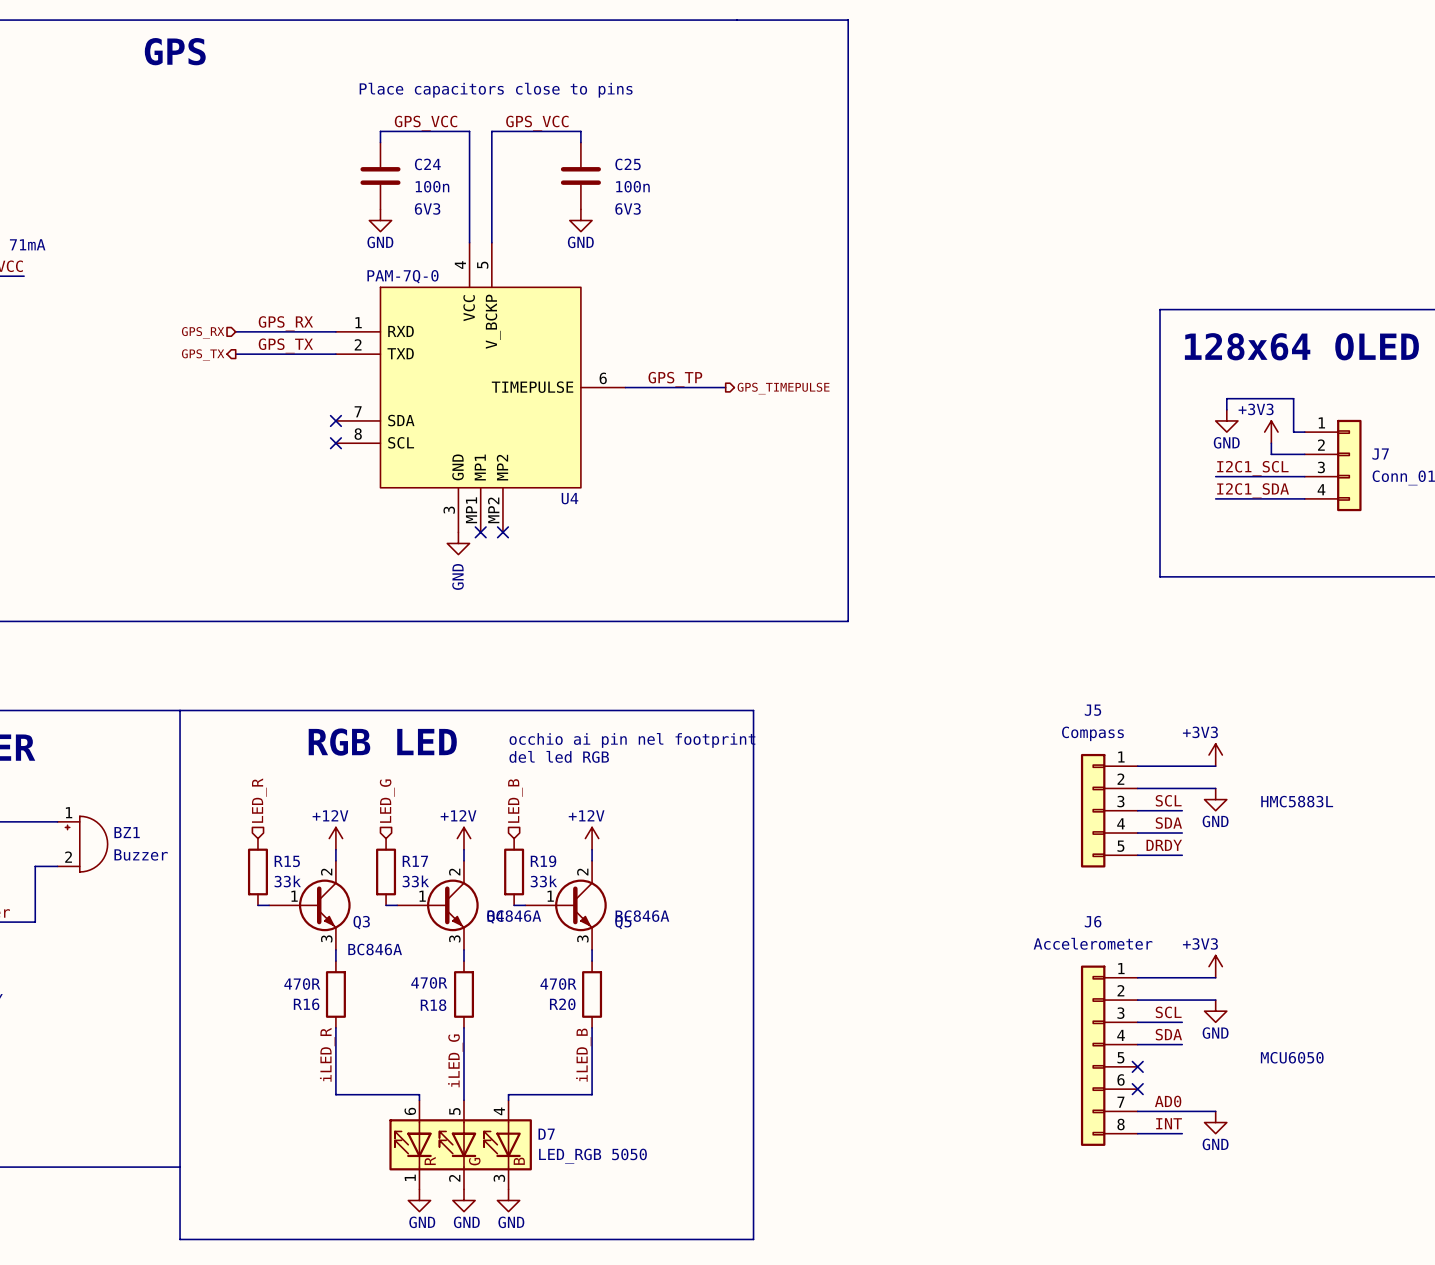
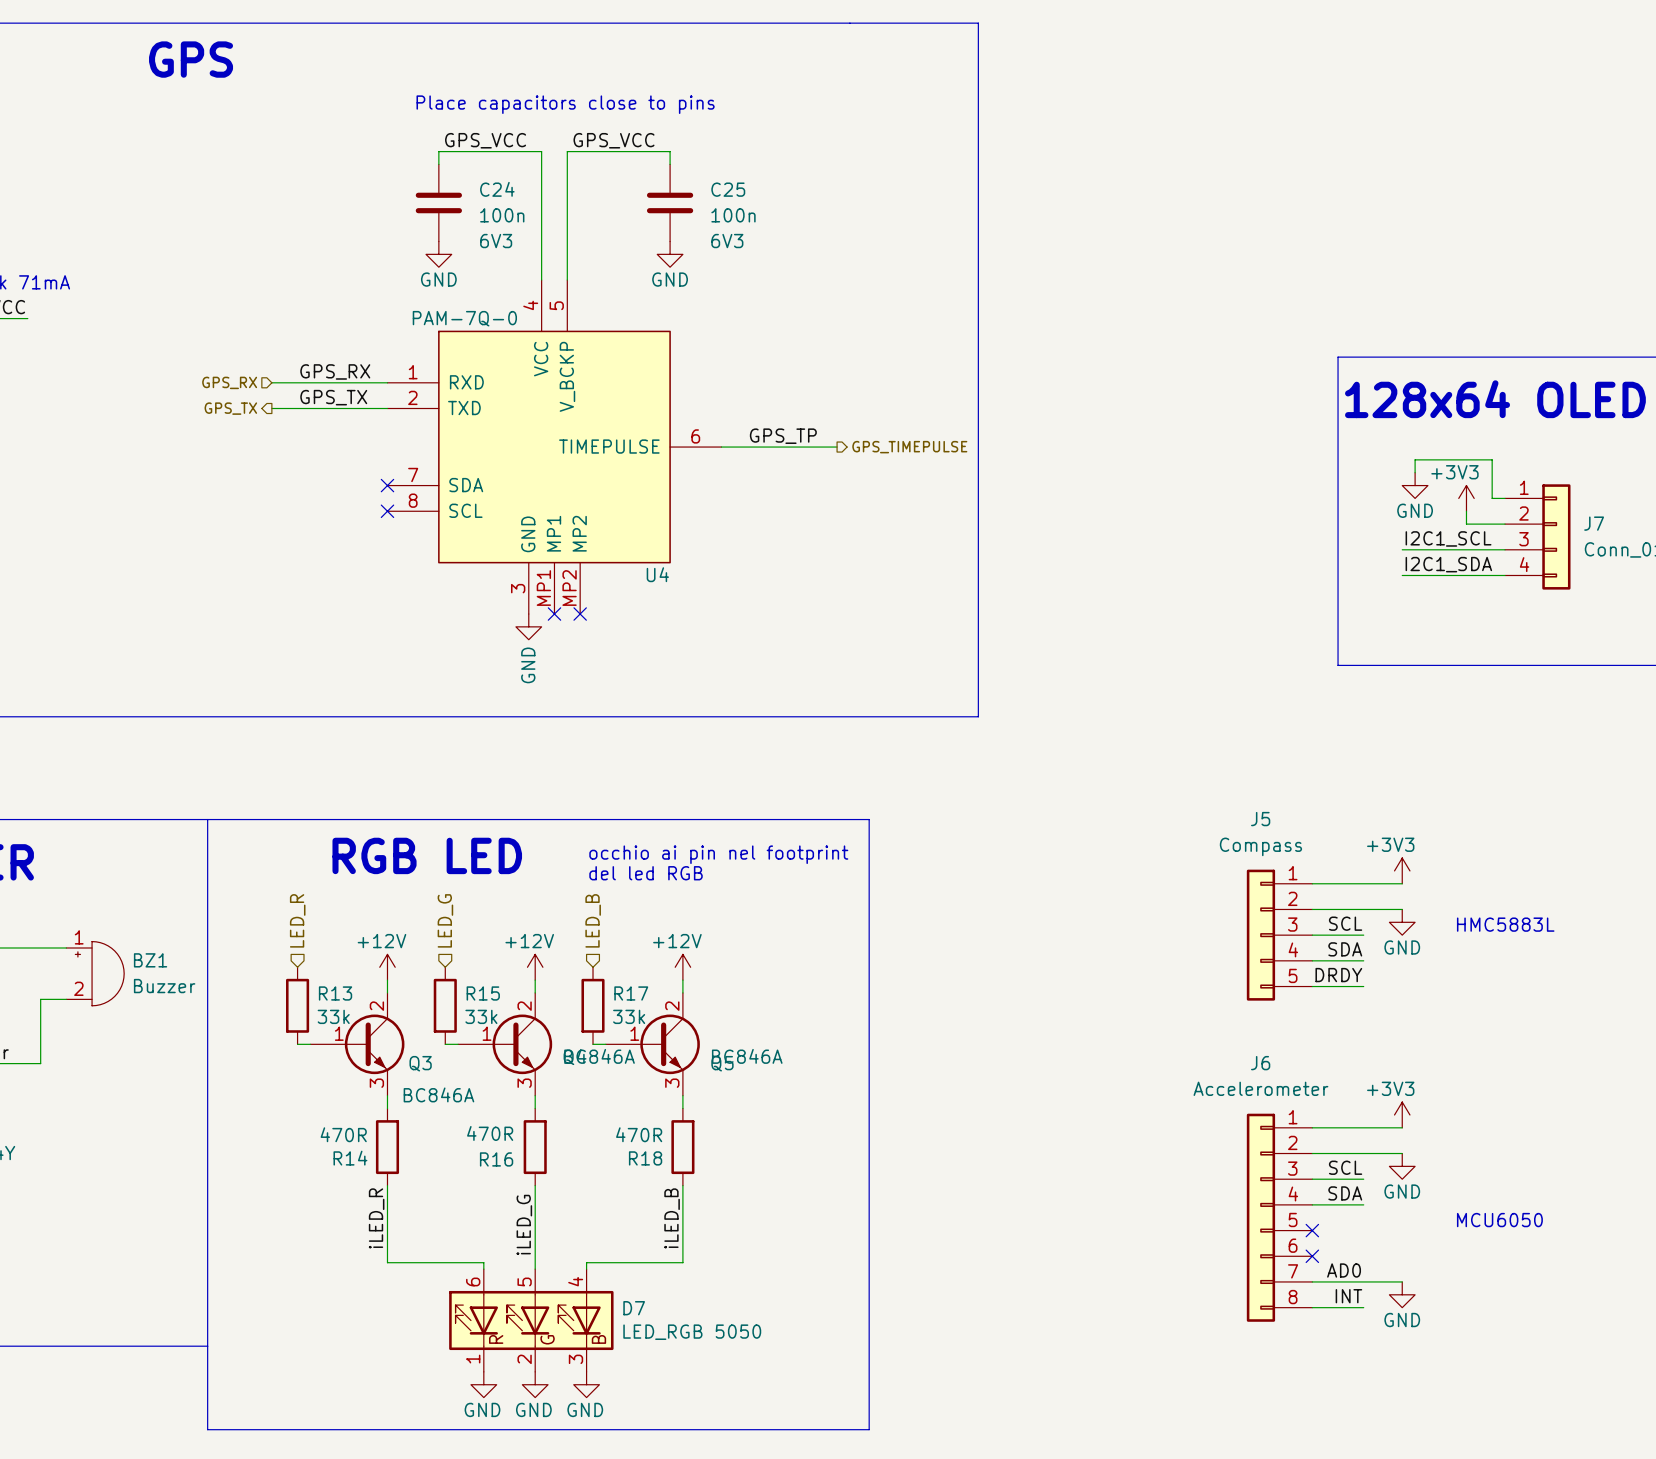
R15 name: R15 (287, 861) -> R13 (335, 993)
R17 name: R17 (415, 861) -> R15 (483, 993)
R19 name: R19 (543, 861) -> R17 (631, 993)
R16 name: R16 (306, 1004) -> R14 (350, 1158)
R20 name: R20 (562, 1004) -> R18 (645, 1158)
R18 name: R18 (433, 1005) -> R16 (496, 1159)

